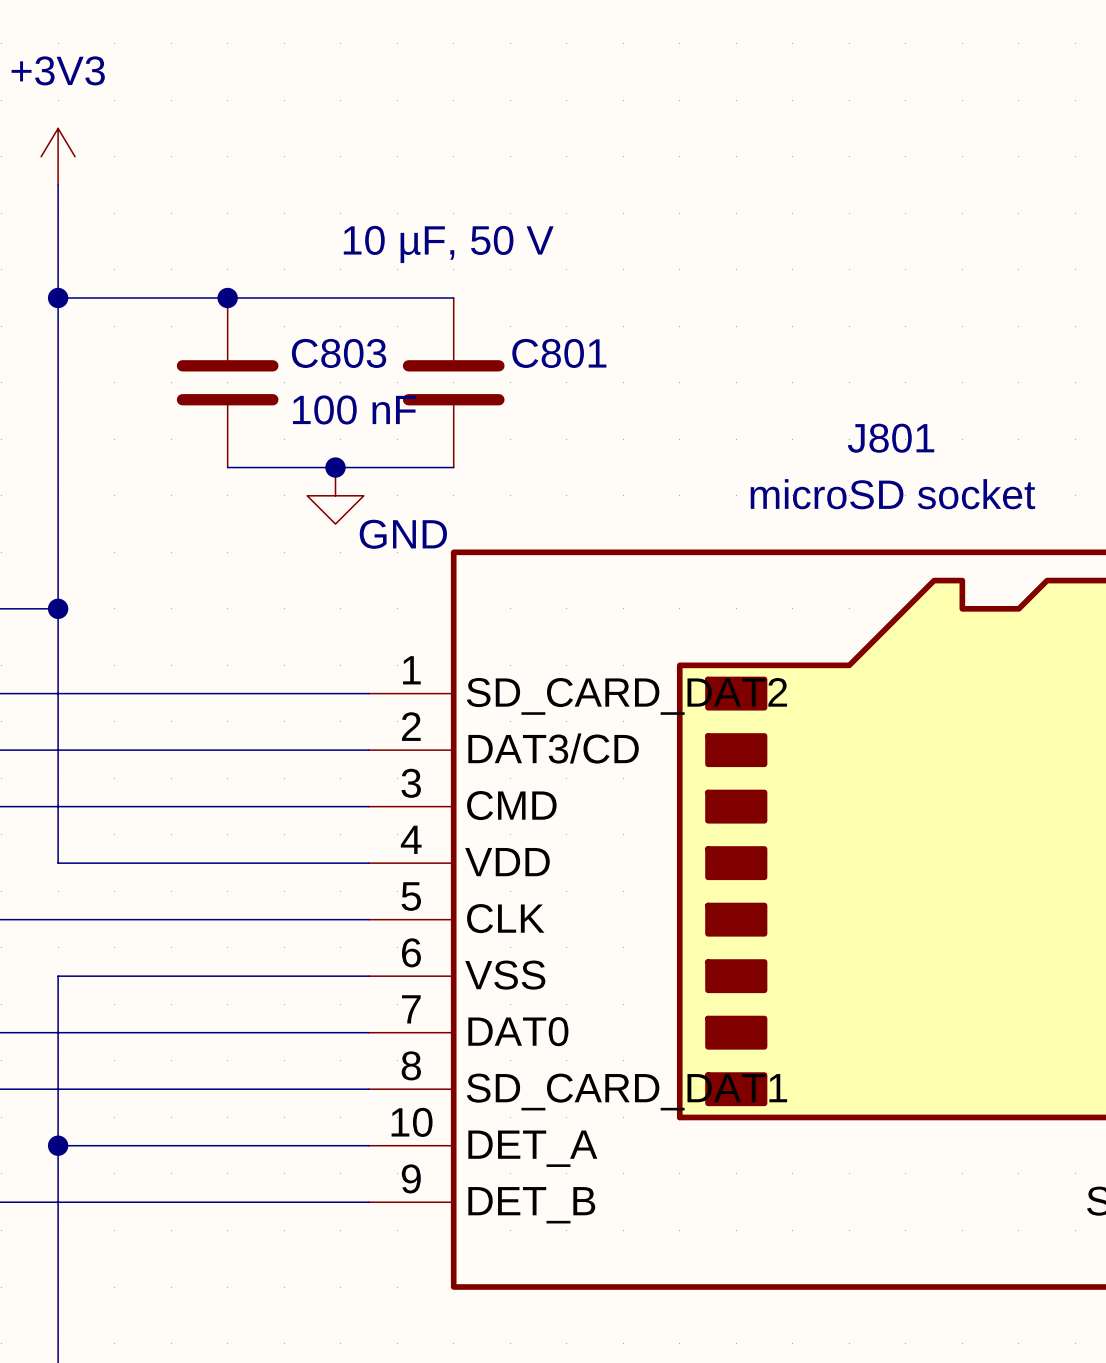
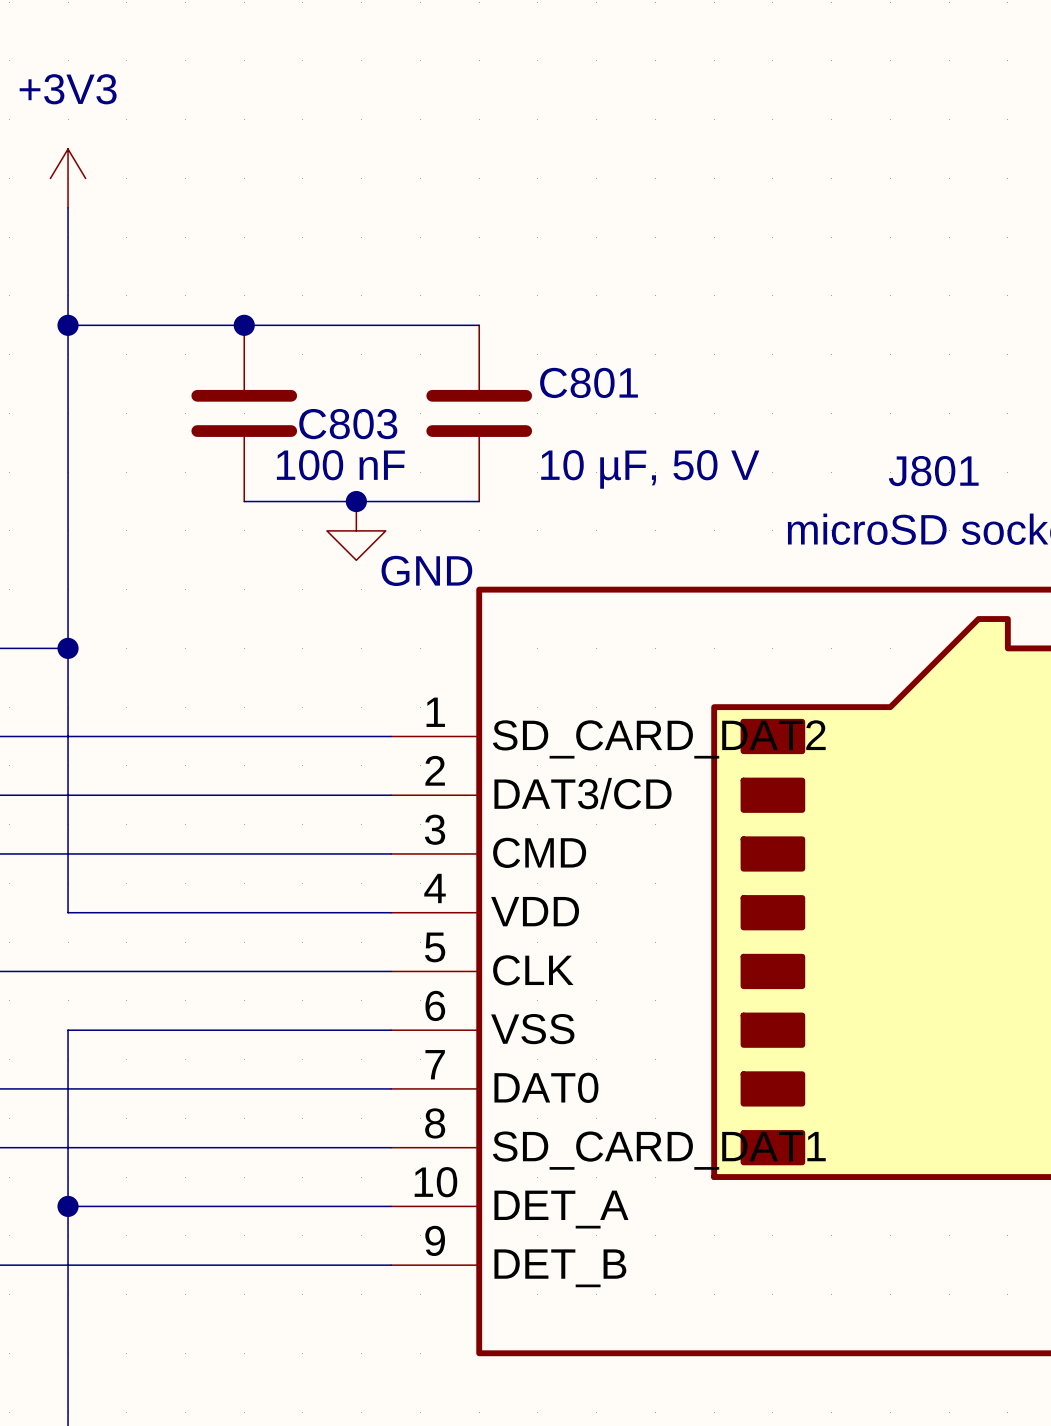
C801 value position: 10 µF, 50 V (448, 244) -> 10 µF, 50 V (650, 469)
C803 name position: C803 (339, 353) -> C803 (348, 424)
C803 value position: 100 nF (354, 409) -> 100 nF (340, 465)

